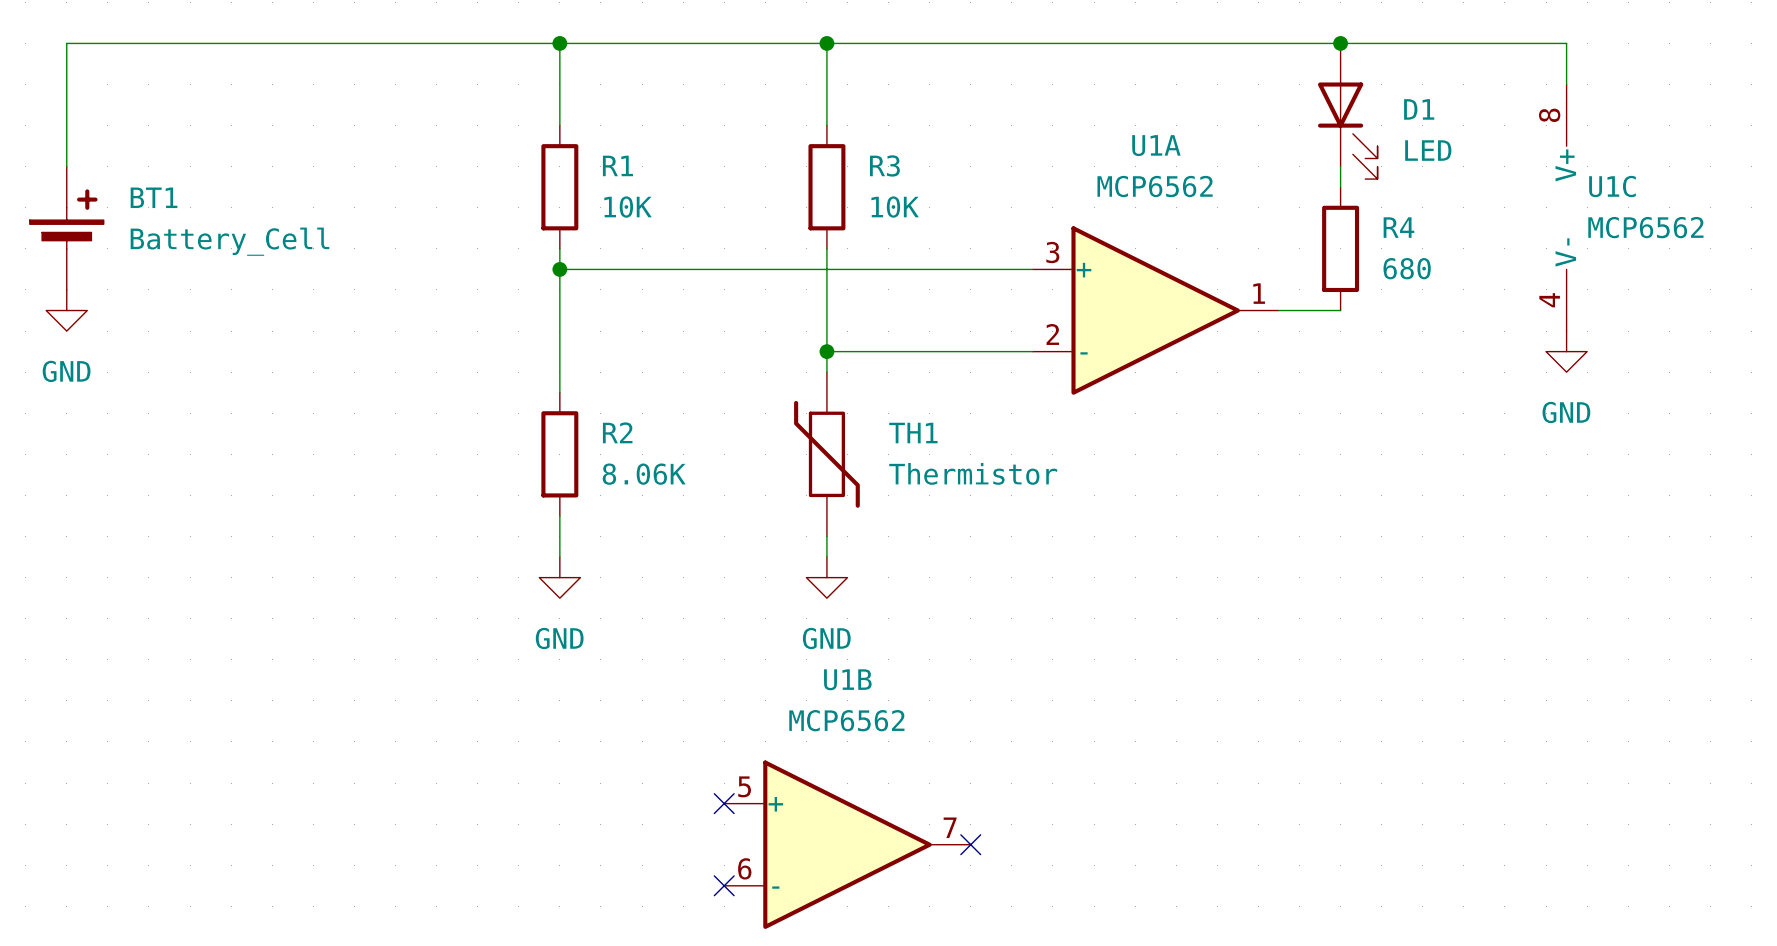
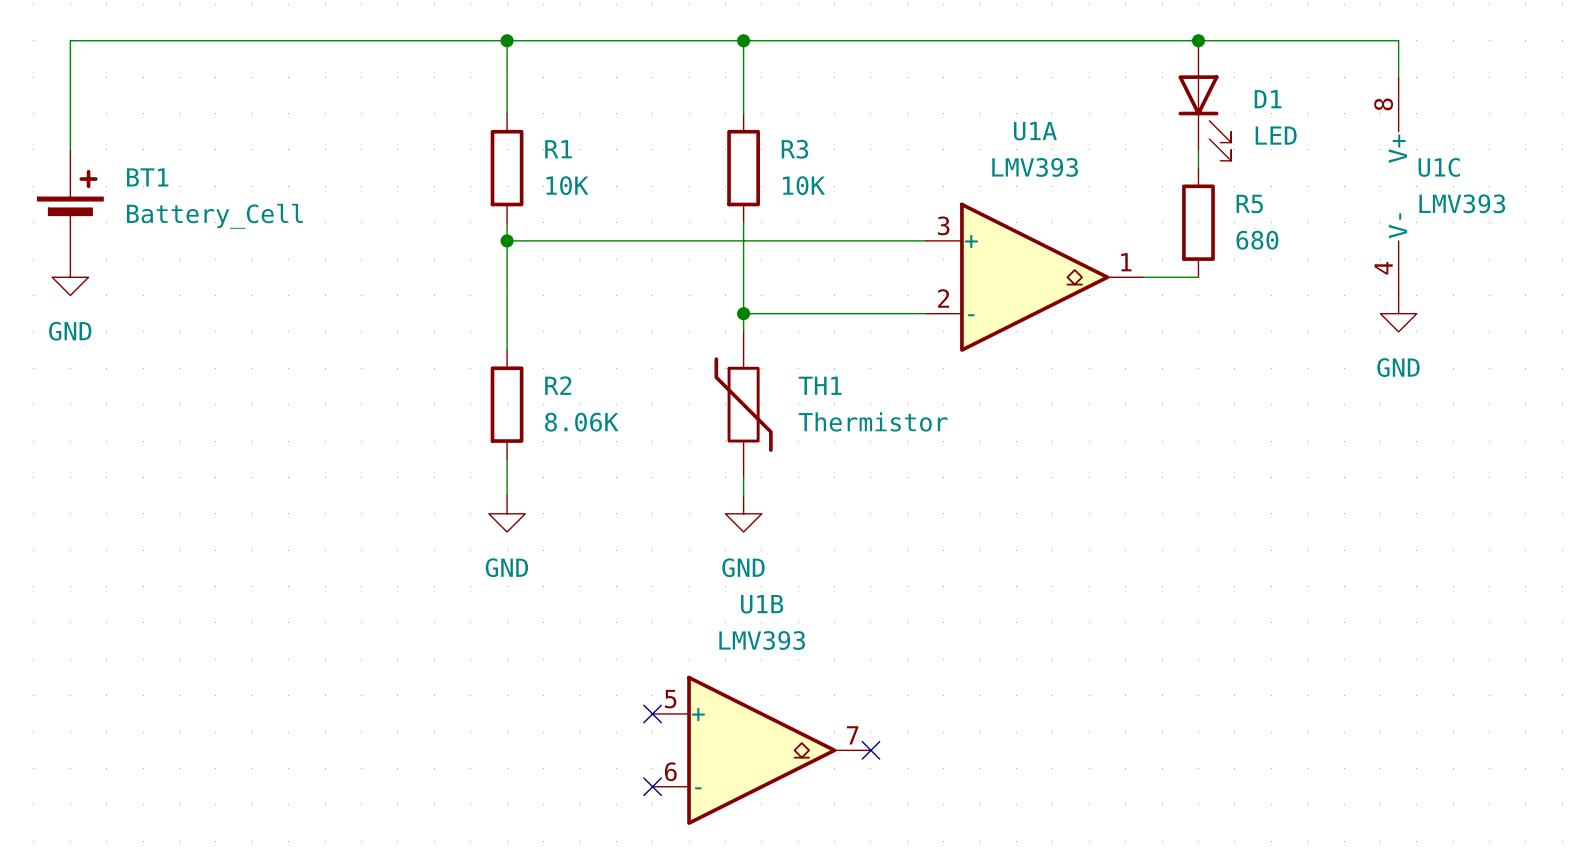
U1A value: MCP6562 (1155, 186) -> LMV393 (1035, 167)
U1A symbol: [1032, 226, 1279, 395] -> [925, 202, 1144, 352]
R4 name: R4 (1398, 227) -> R5 (1249, 204)
U1C value: MCP6562 (1645, 227) -> LMV393 (1462, 203)
U1B value: MCP6562 (846, 720) -> LMV393 (762, 640)
U1B symbol: [724, 760, 971, 929] -> [652, 675, 871, 825]

